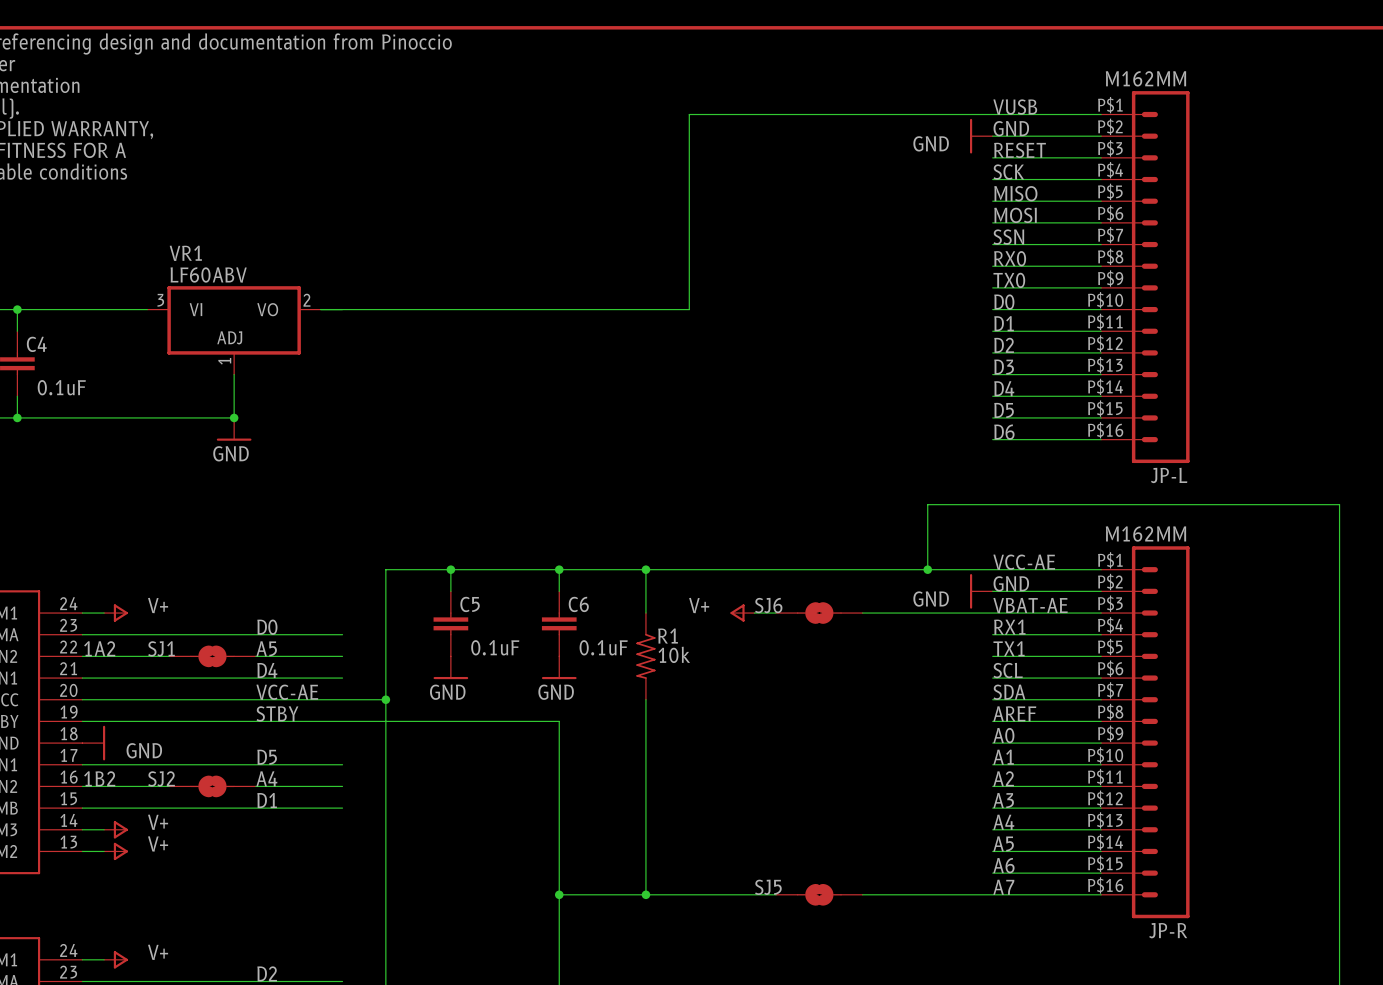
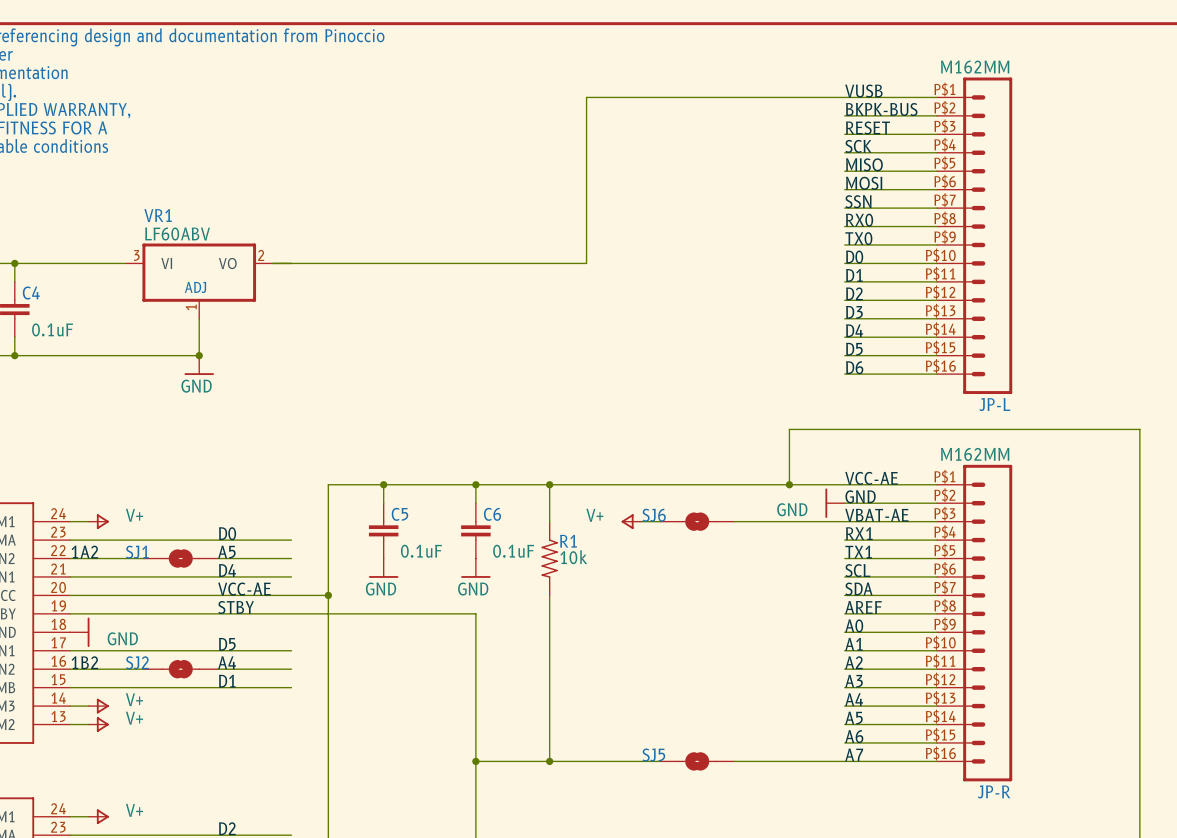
label: GND (1011, 128) -> BKPK-BUS (881, 109)
power symbol: GND (981, 136) -> none

